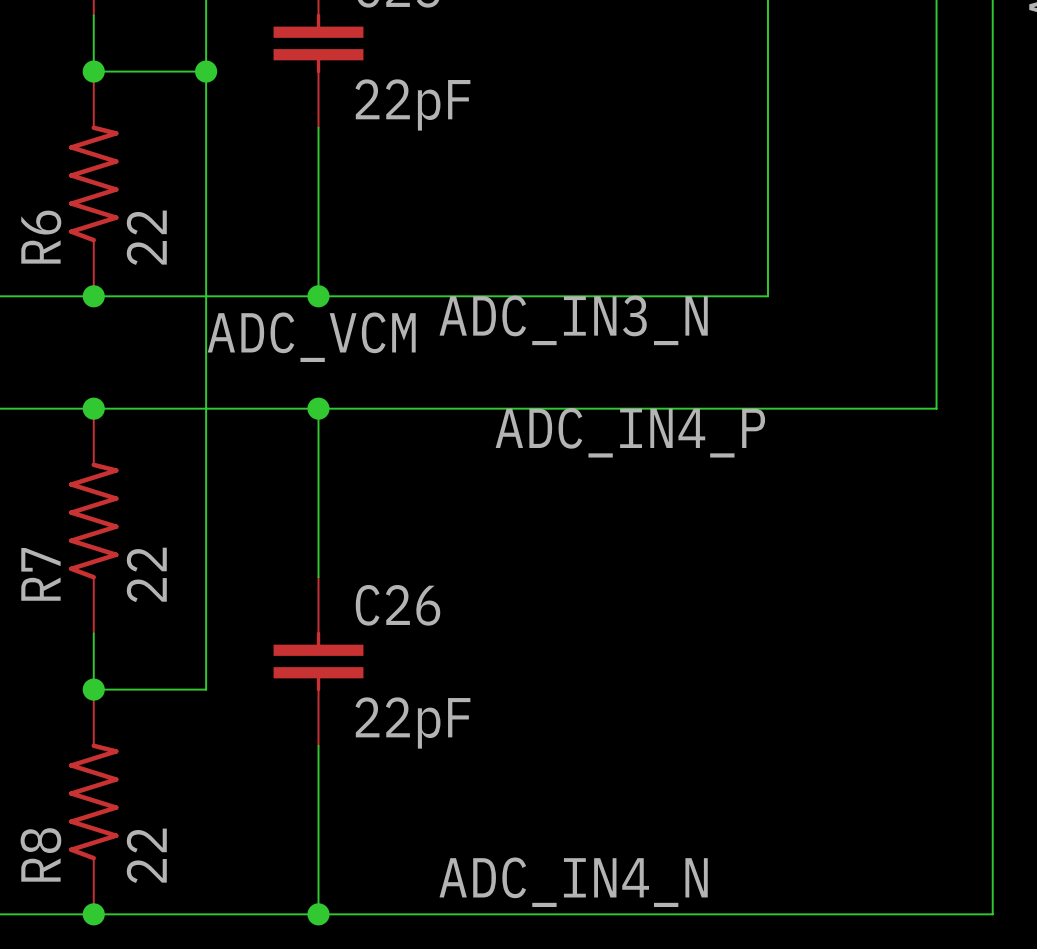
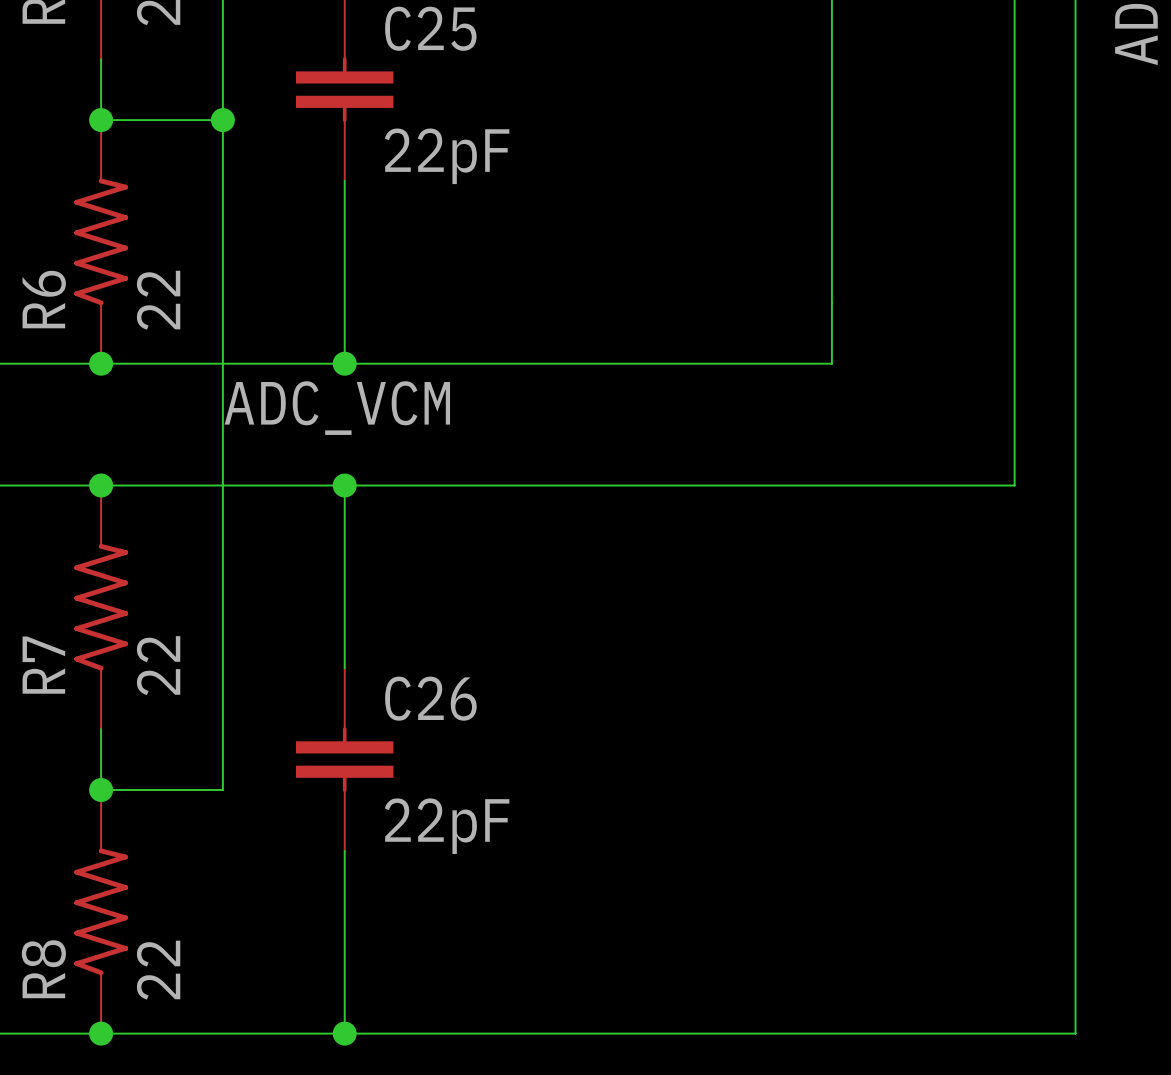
label: ADC_IN3_N (573, 320) -> none
label: ADC_IN4_P (630, 432) -> none
label: ADC_IN4_N (573, 882) -> none

